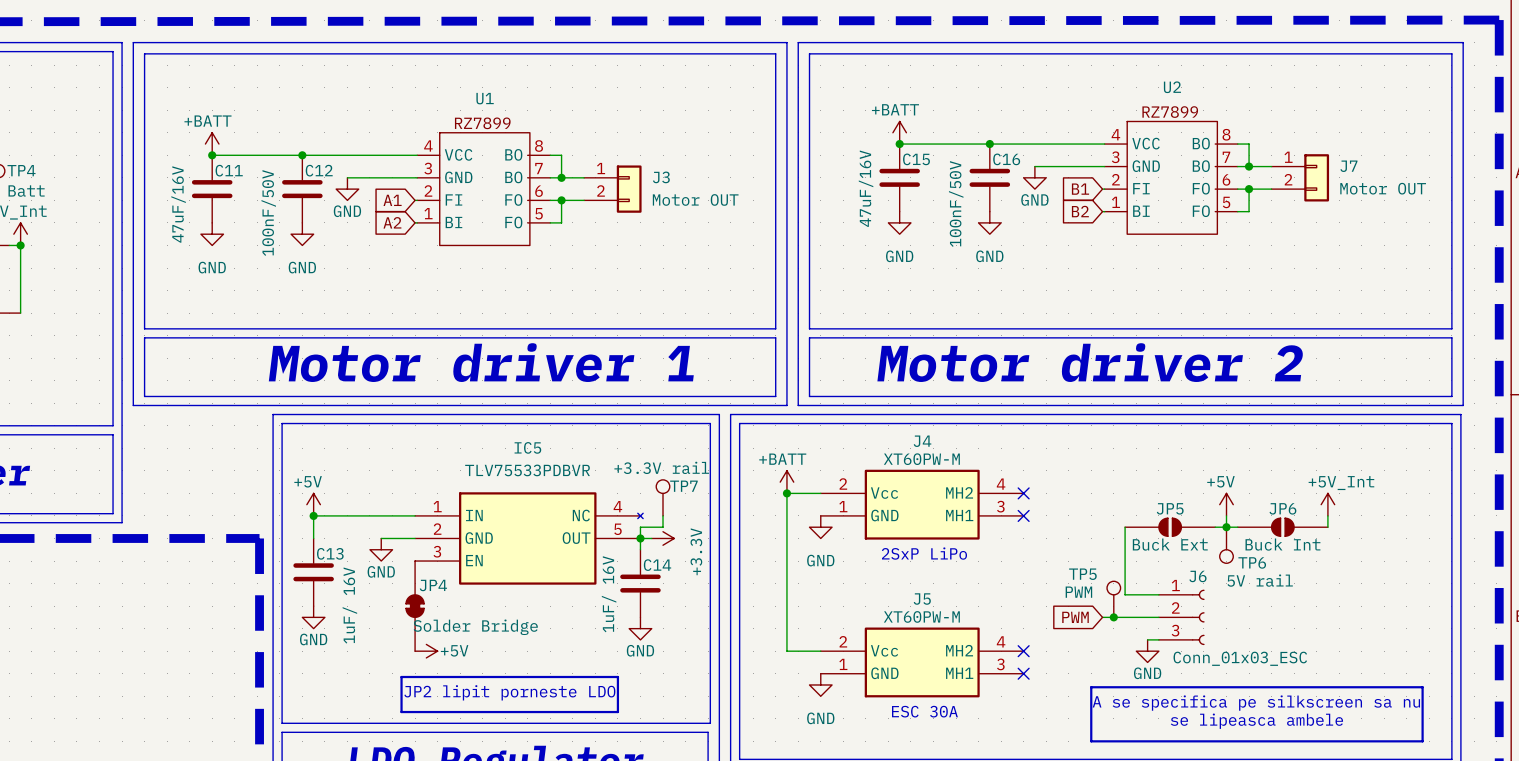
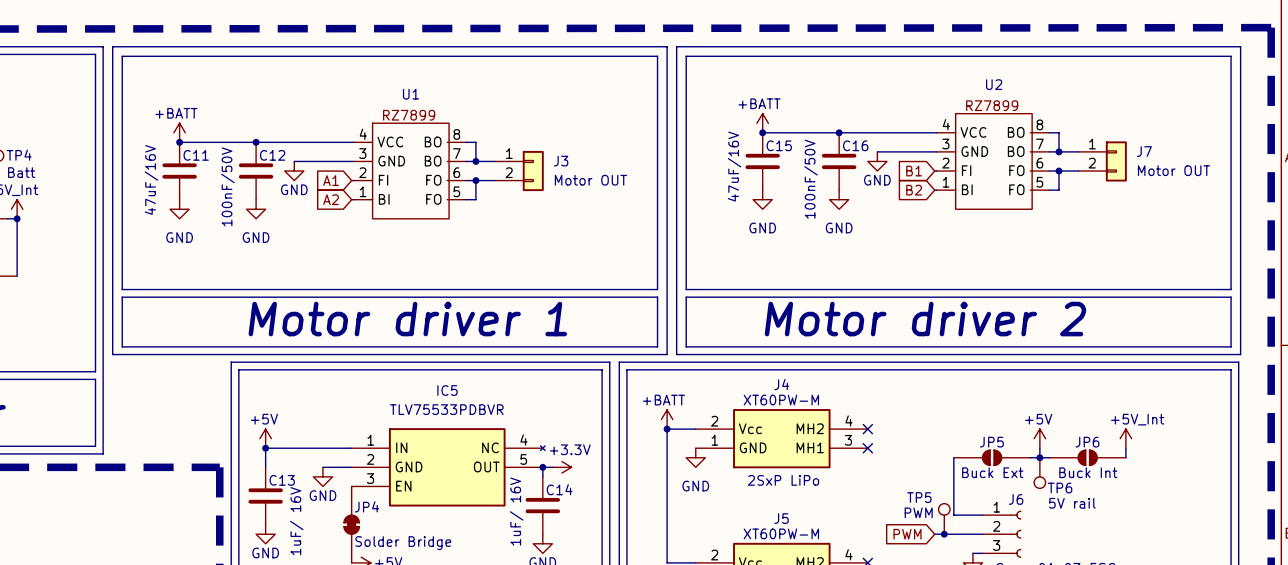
TP7: +3.3V rail (663, 497) -> none
wire: (663, 515) (663, 527) (640, 527) (640, 538) -> none
power symbol text rotation: 0° (696, 551) -> 90° clockwise (570, 449)

